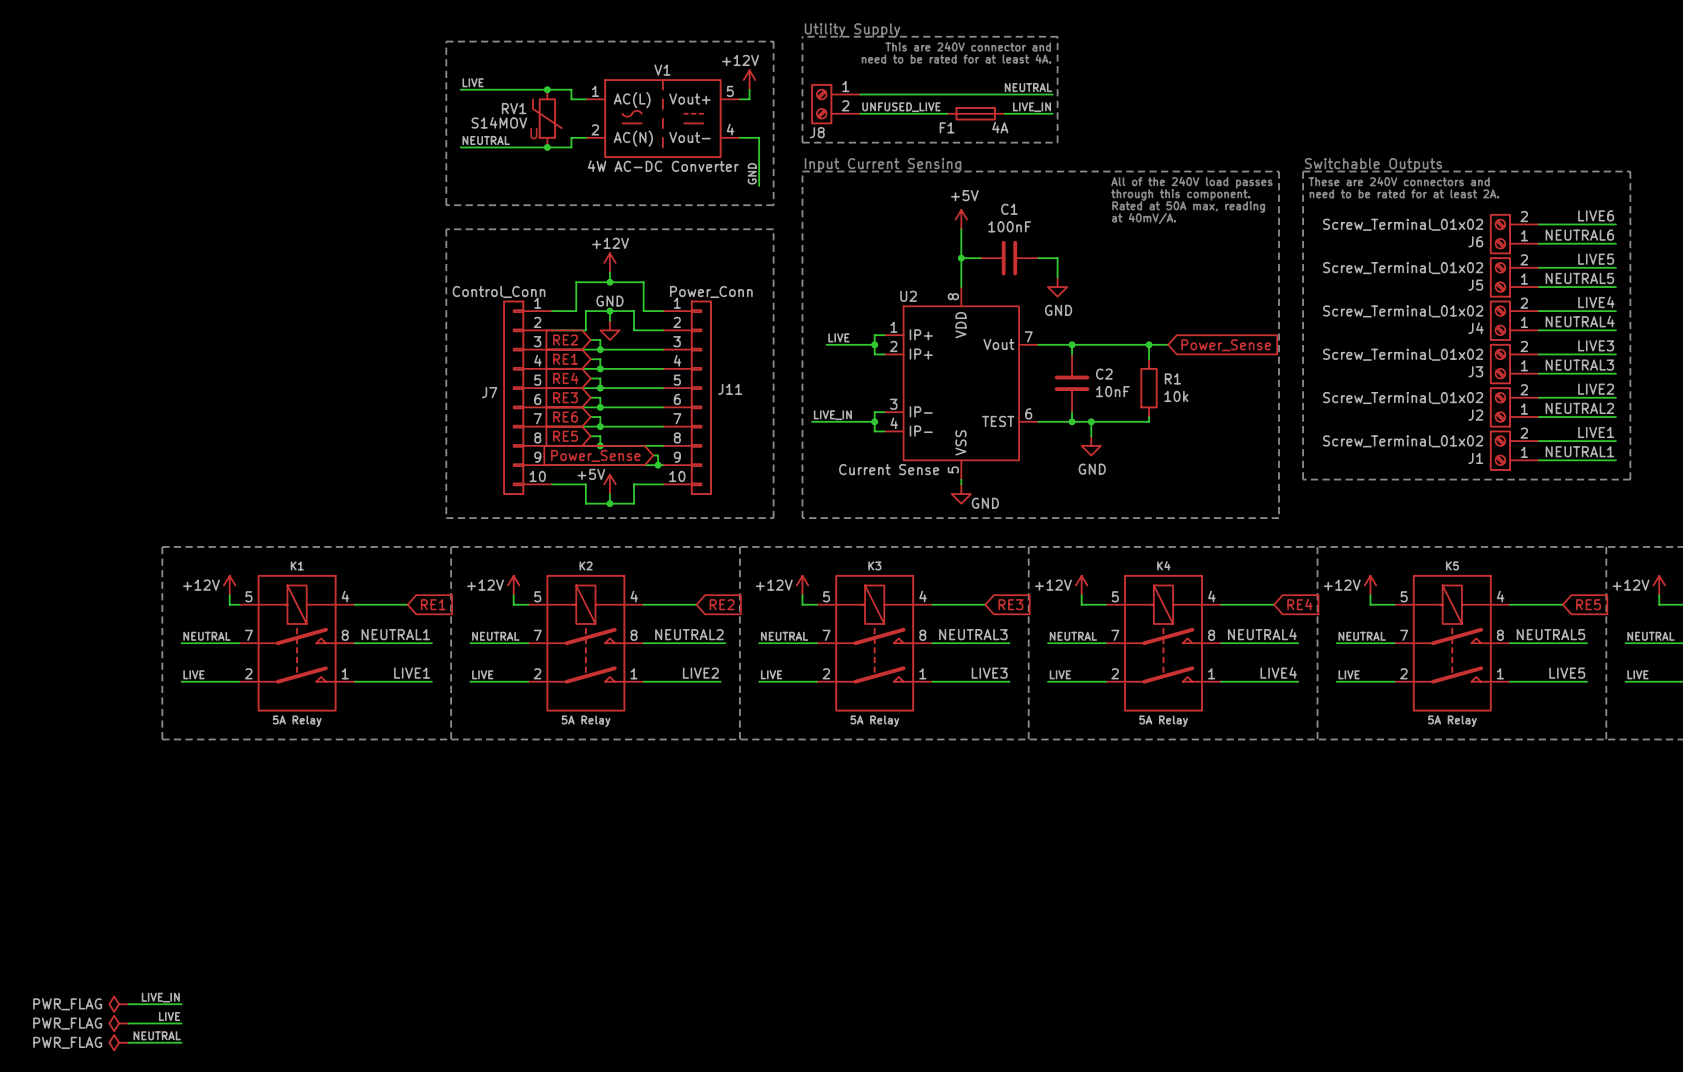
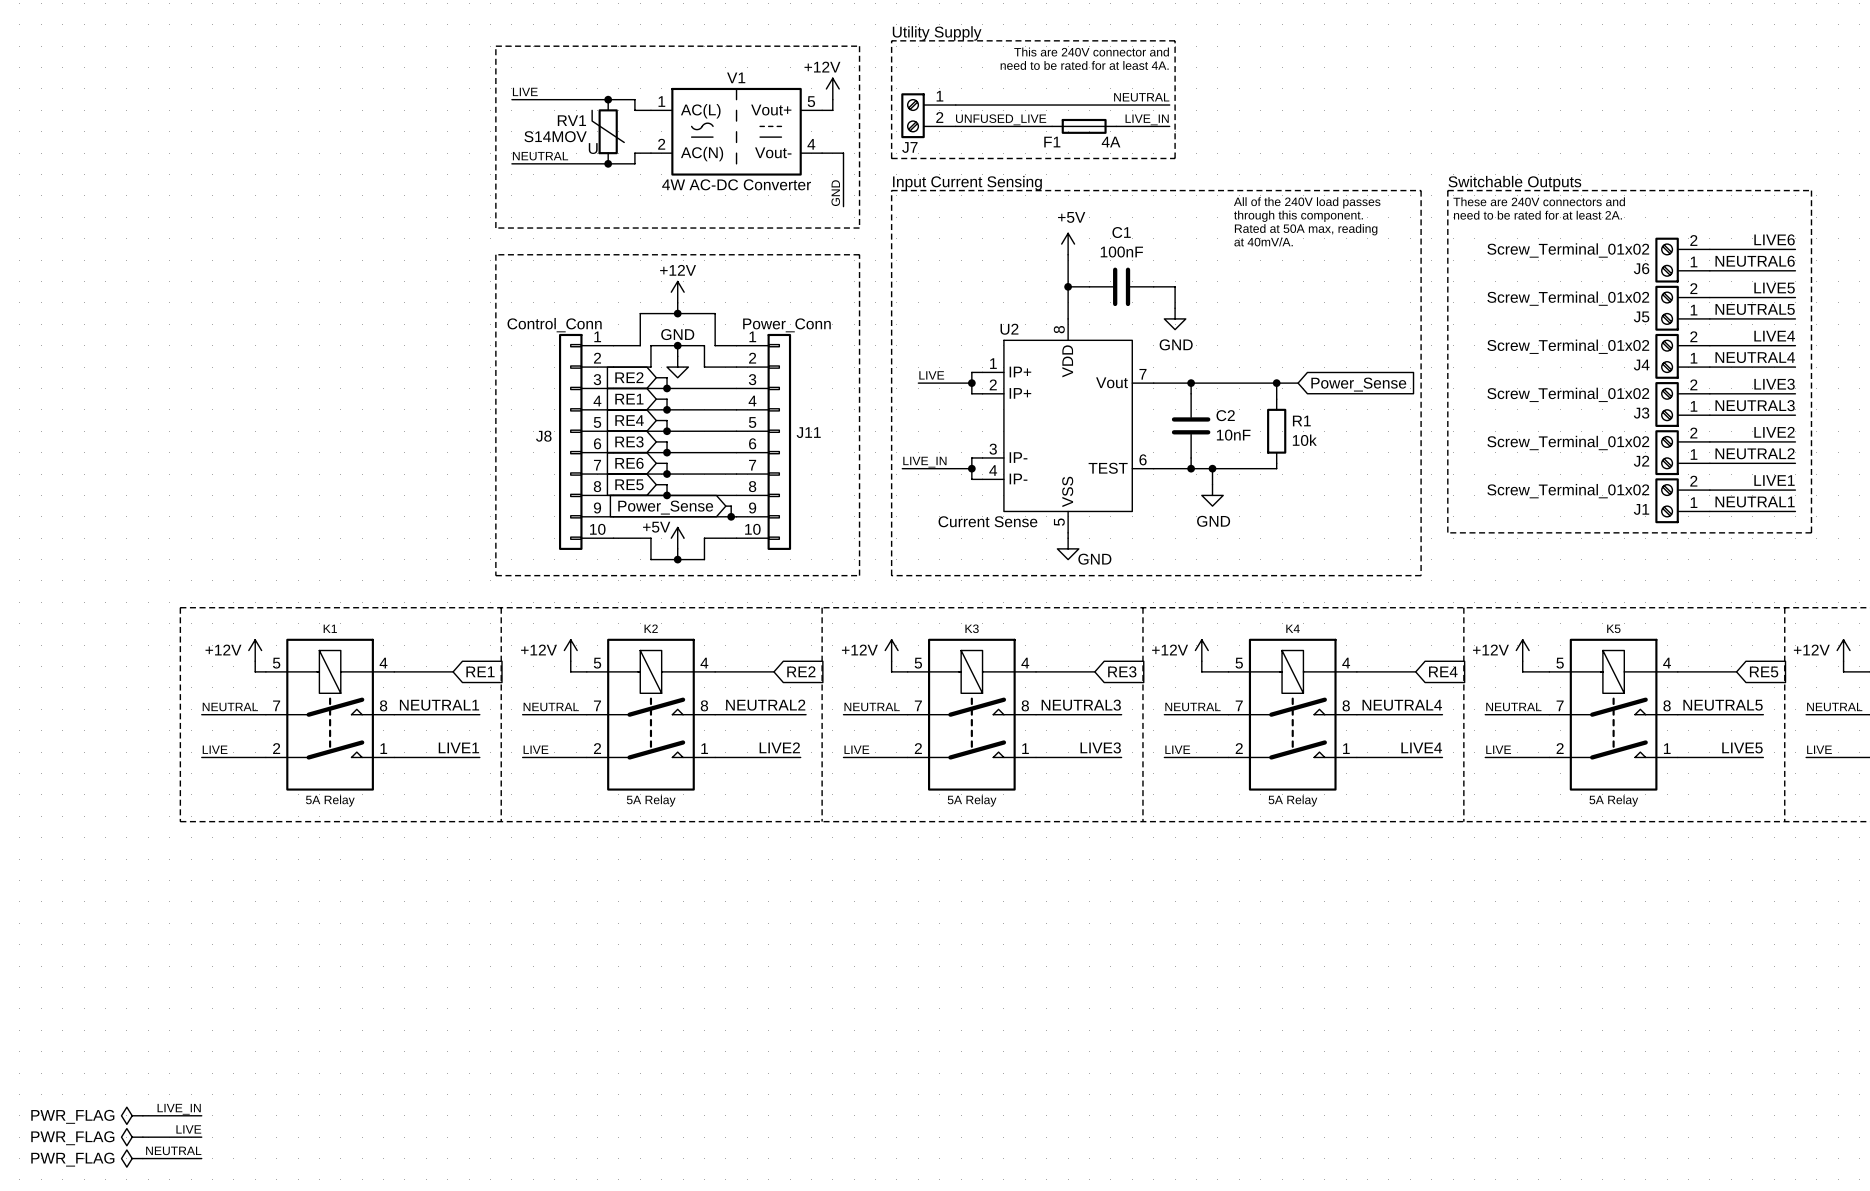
J8 name: J8 (817, 132) -> J7 (909, 147)
J7 name: J7 (489, 392) -> J8 (543, 436)

